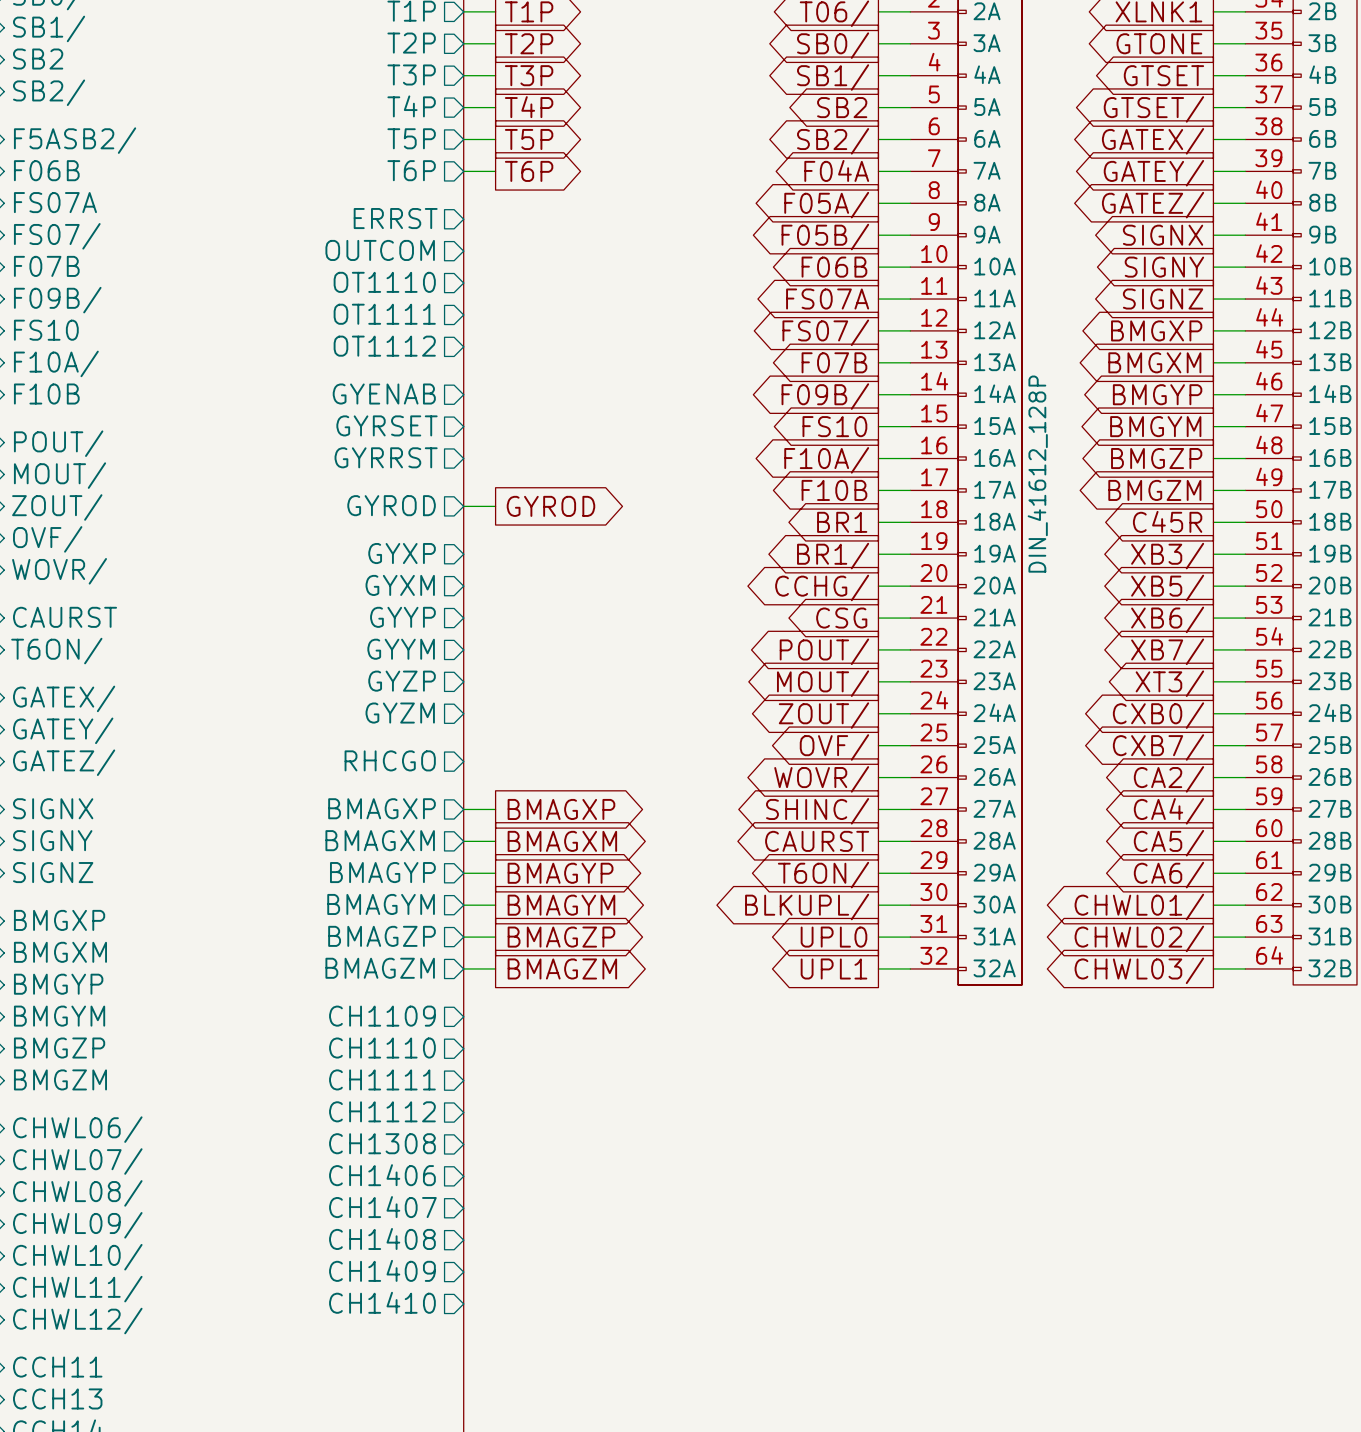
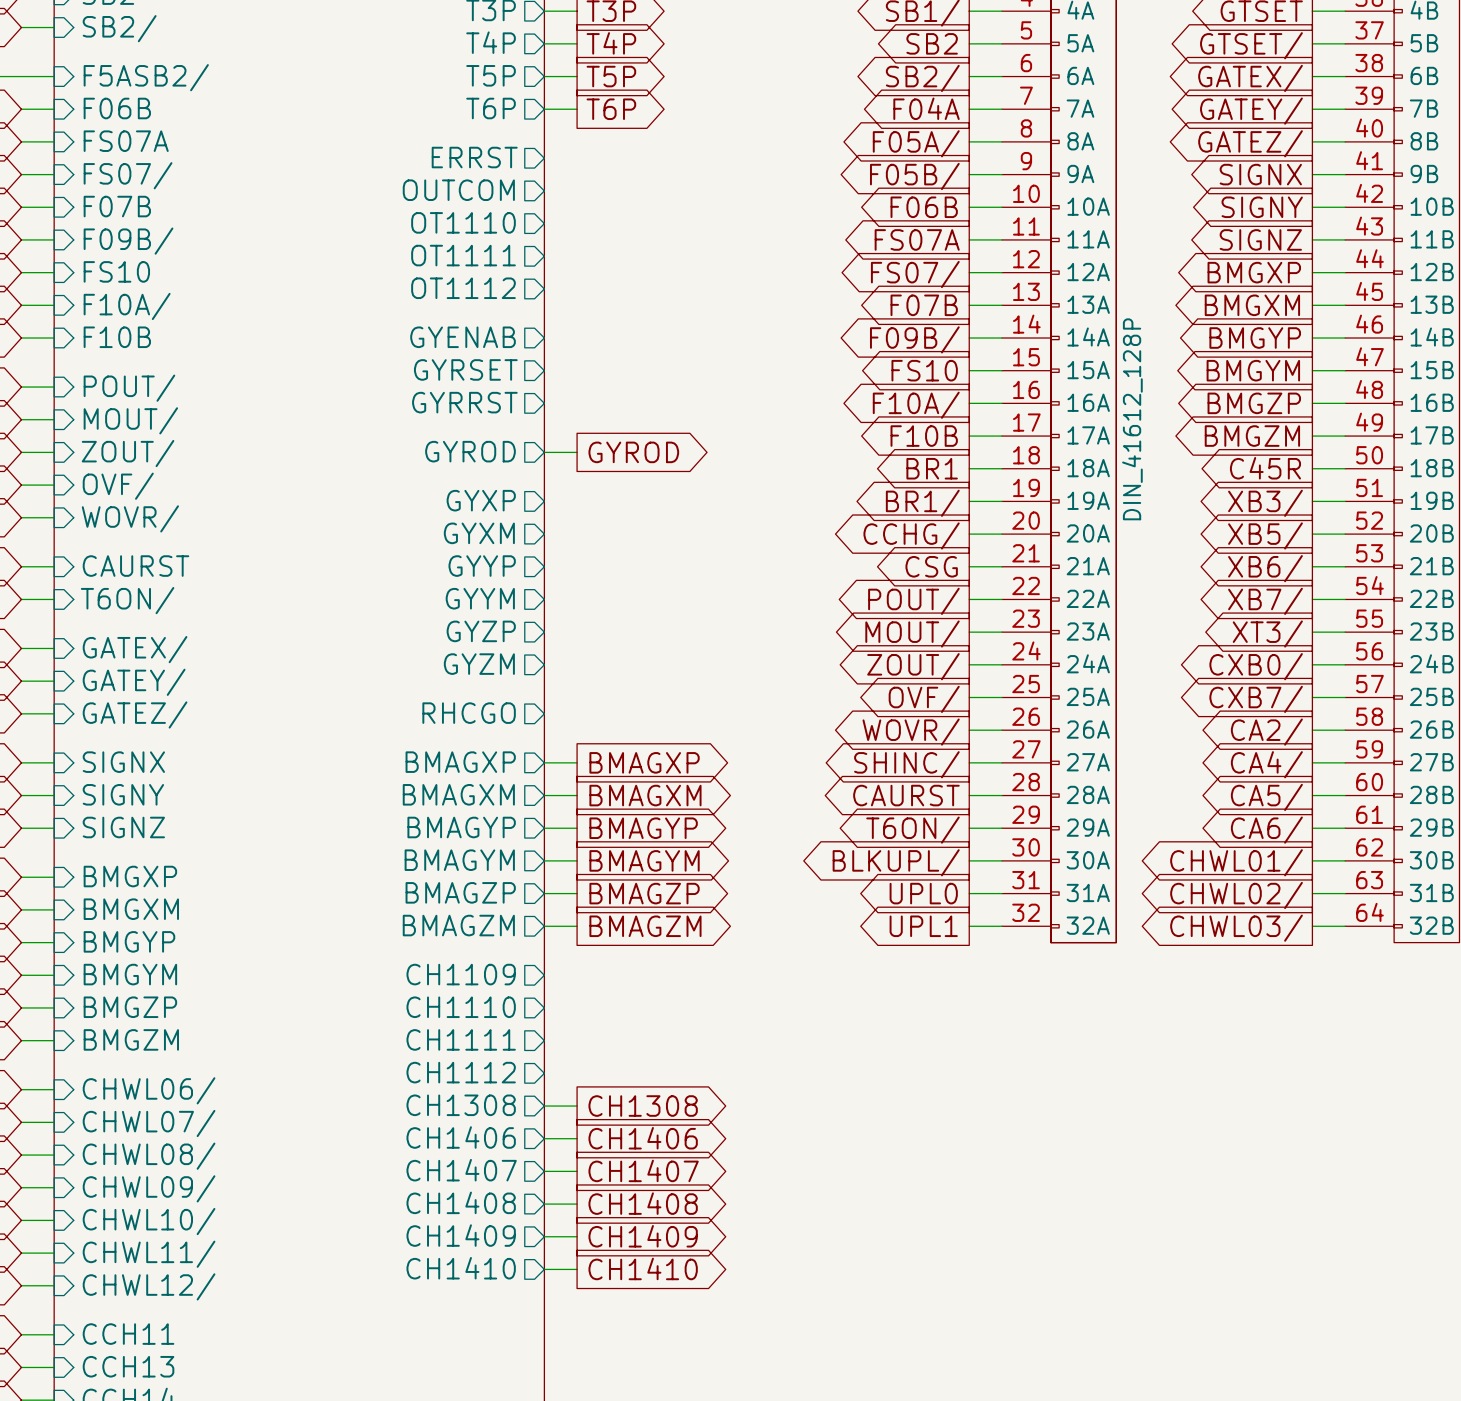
wire: none -> (544, 1106) (577, 1106)
global label: none -> CH1308 (643, 1106)
global label: none -> CH1406 (643, 1138)
wire: none -> (544, 1138) (577, 1138)
global label: none -> CH1407 (643, 1170)
wire: none -> (544, 1171) (577, 1171)
global label: none -> CH1408 (643, 1203)
wire: none -> (544, 1204) (577, 1204)
global label: none -> CH1409 (643, 1236)
wire: none -> (544, 1236) (577, 1236)
wire: none -> (544, 1269) (577, 1269)
global label: none -> CH1410 (643, 1268)

